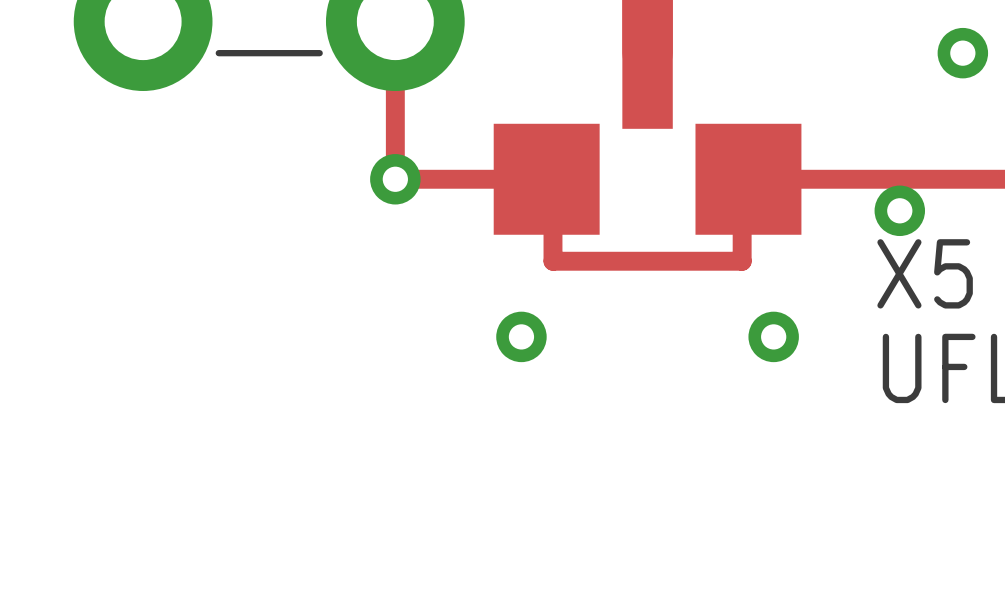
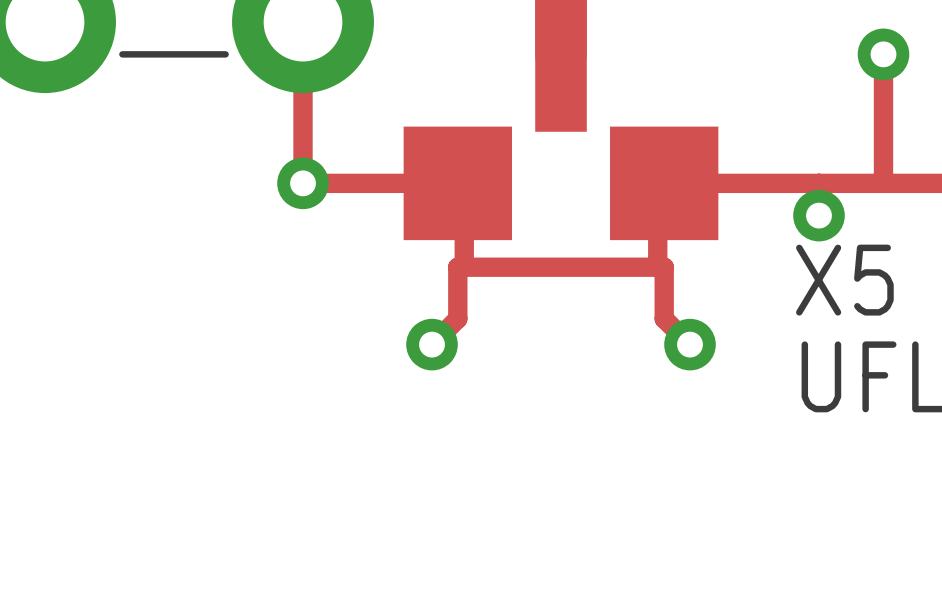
track: none -> (883, 54) (883, 183)
track: none -> (464, 267) (457, 267) (457, 318) (432, 344)
track: none -> (657, 267) (664, 267) (664, 318) (690, 344)

